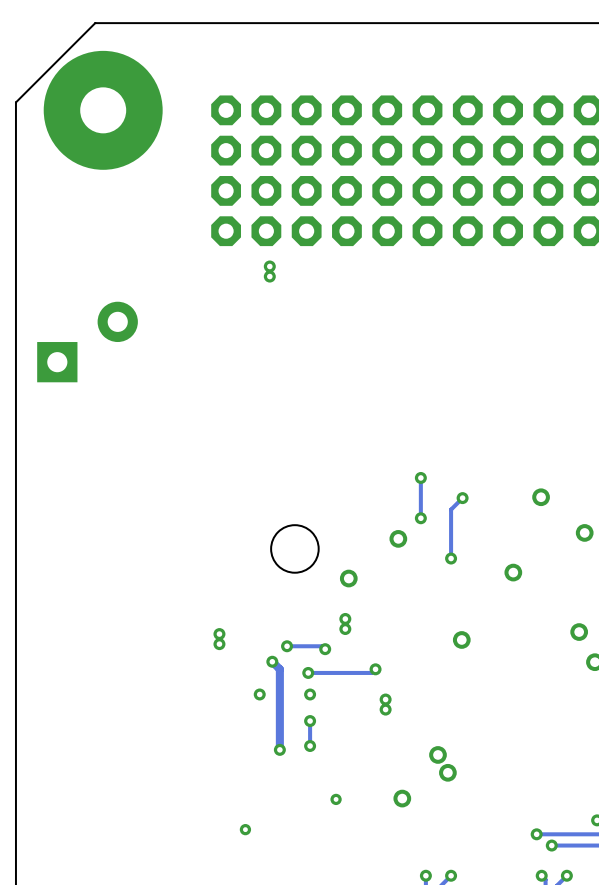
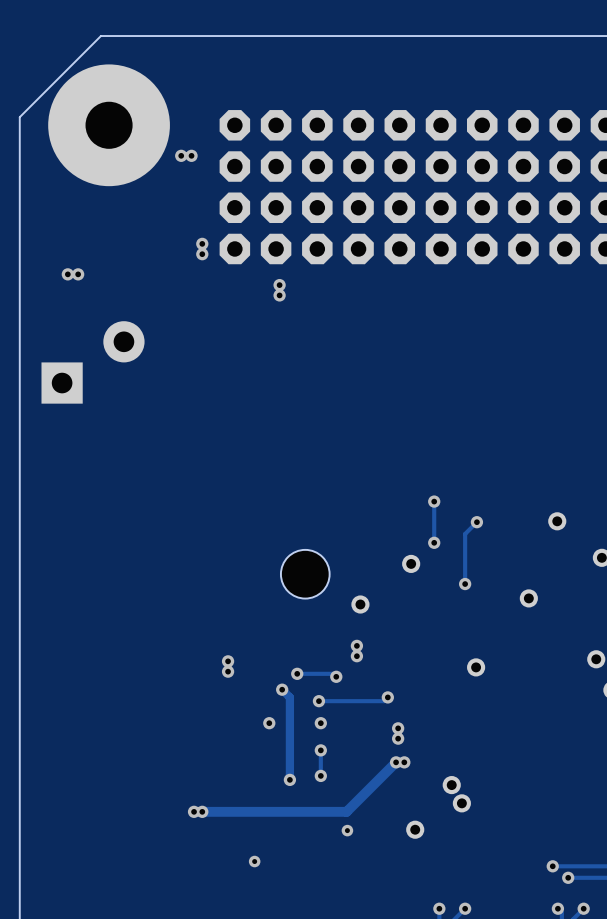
via: none -> (181, 155)
via: none -> (191, 155)
via: none -> (202, 243)
via: none -> (202, 254)
via: none -> (67, 274)
via: none -> (78, 274)
via: none -> (396, 762)
track: none -> (404, 762) (396, 762) (346, 811) (202, 811)
via: none -> (404, 762)
via: none -> (194, 811)
via: none -> (202, 811)

